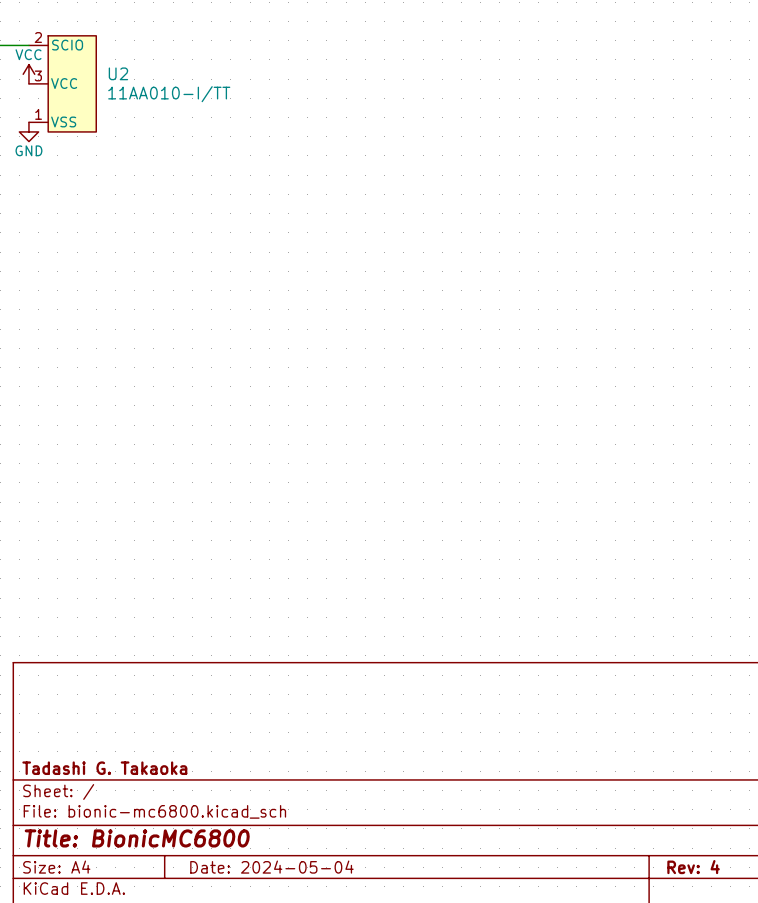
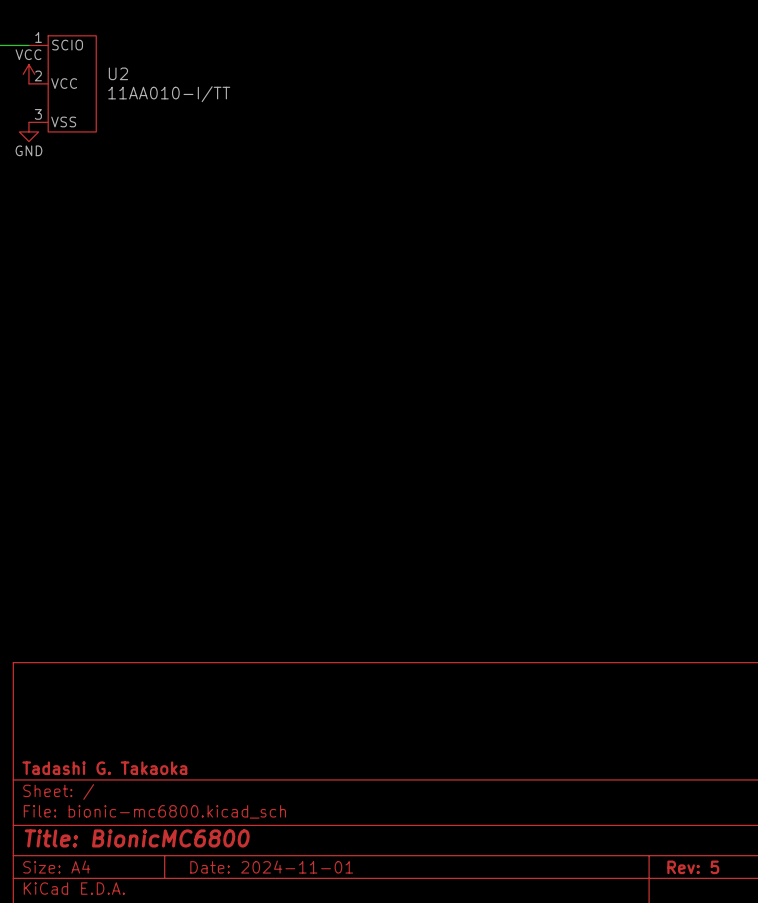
U2 pin number: 2 (38, 37) -> 1 (38, 37)
U2 pin number: 3 (38, 75) -> 2 (38, 75)
U2 pin number: 1 (38, 114) -> 3 (38, 114)
title block: Date: 2024-05-04 (271, 867) -> Date: 2024-11-01 (271, 867)
title block: Rev: 4 (693, 867) -> Rev: 5 (693, 867)

